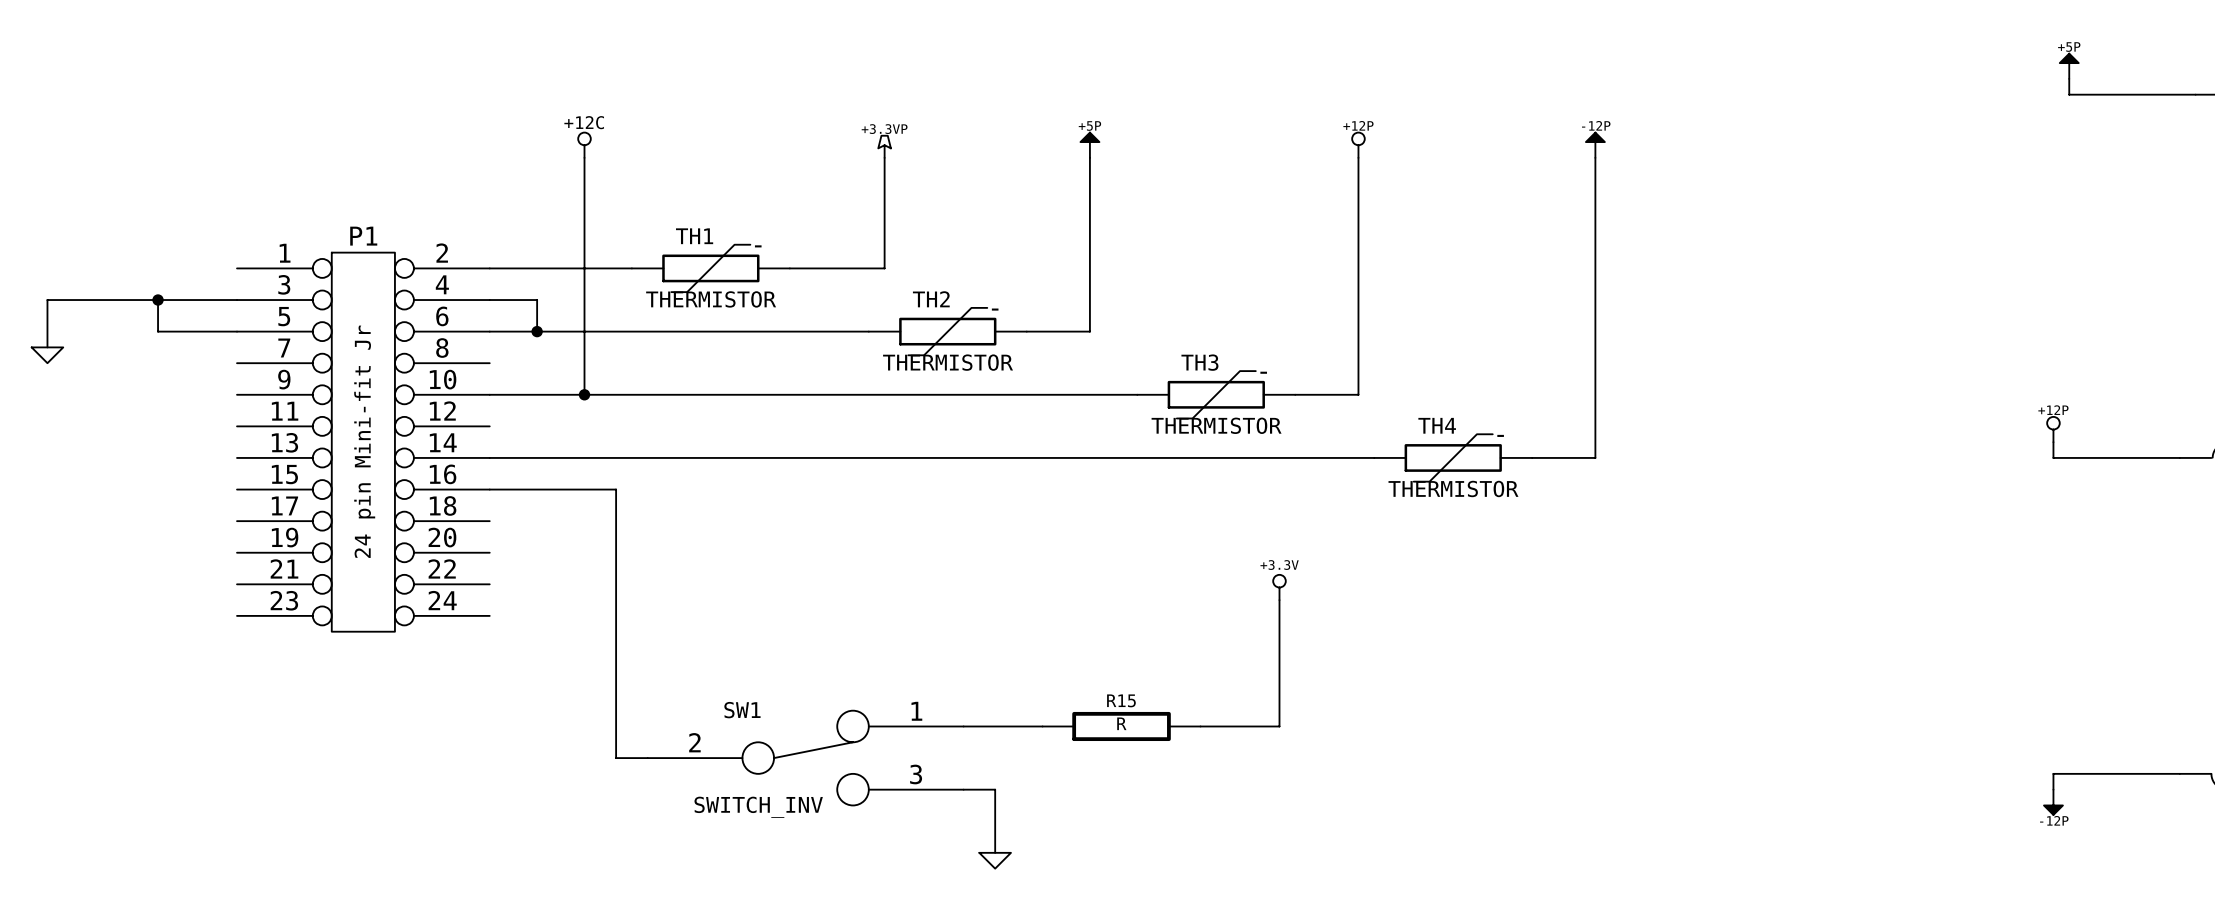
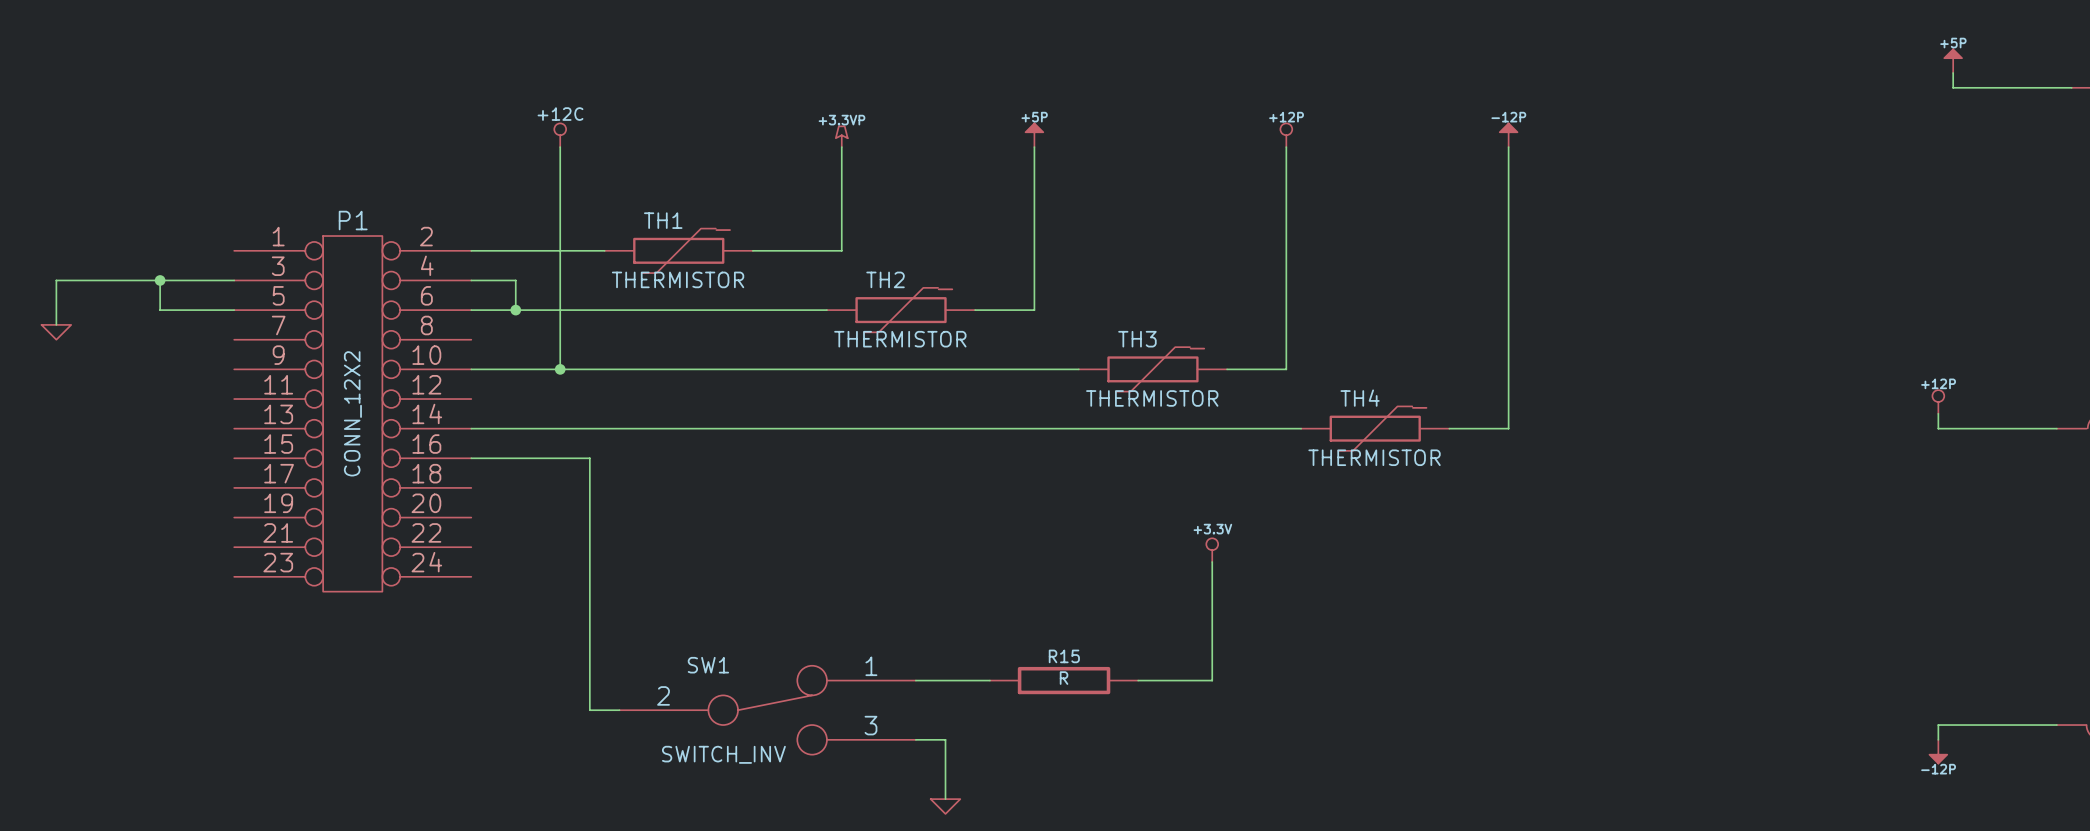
P1 value: 24 pin Mini-fit Jr (364, 441) -> CONN_12X2 (352, 413)

